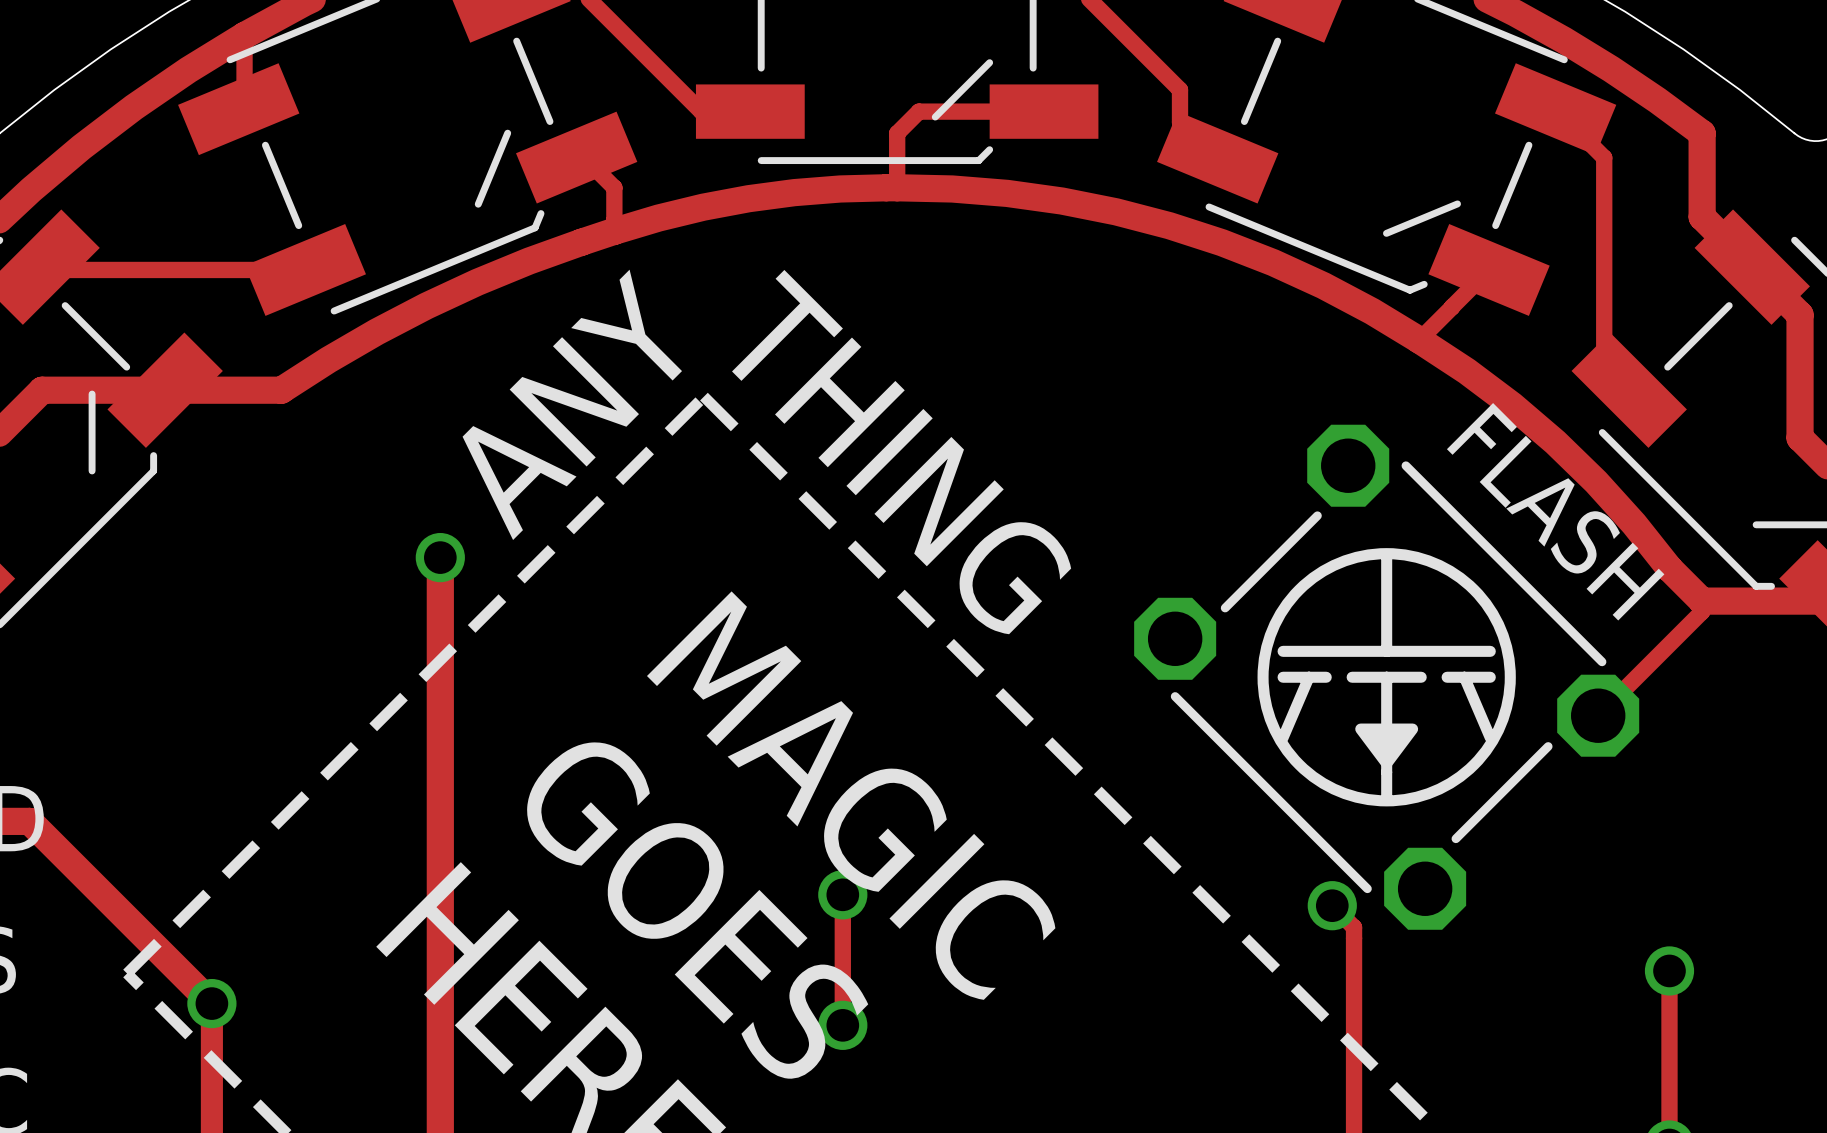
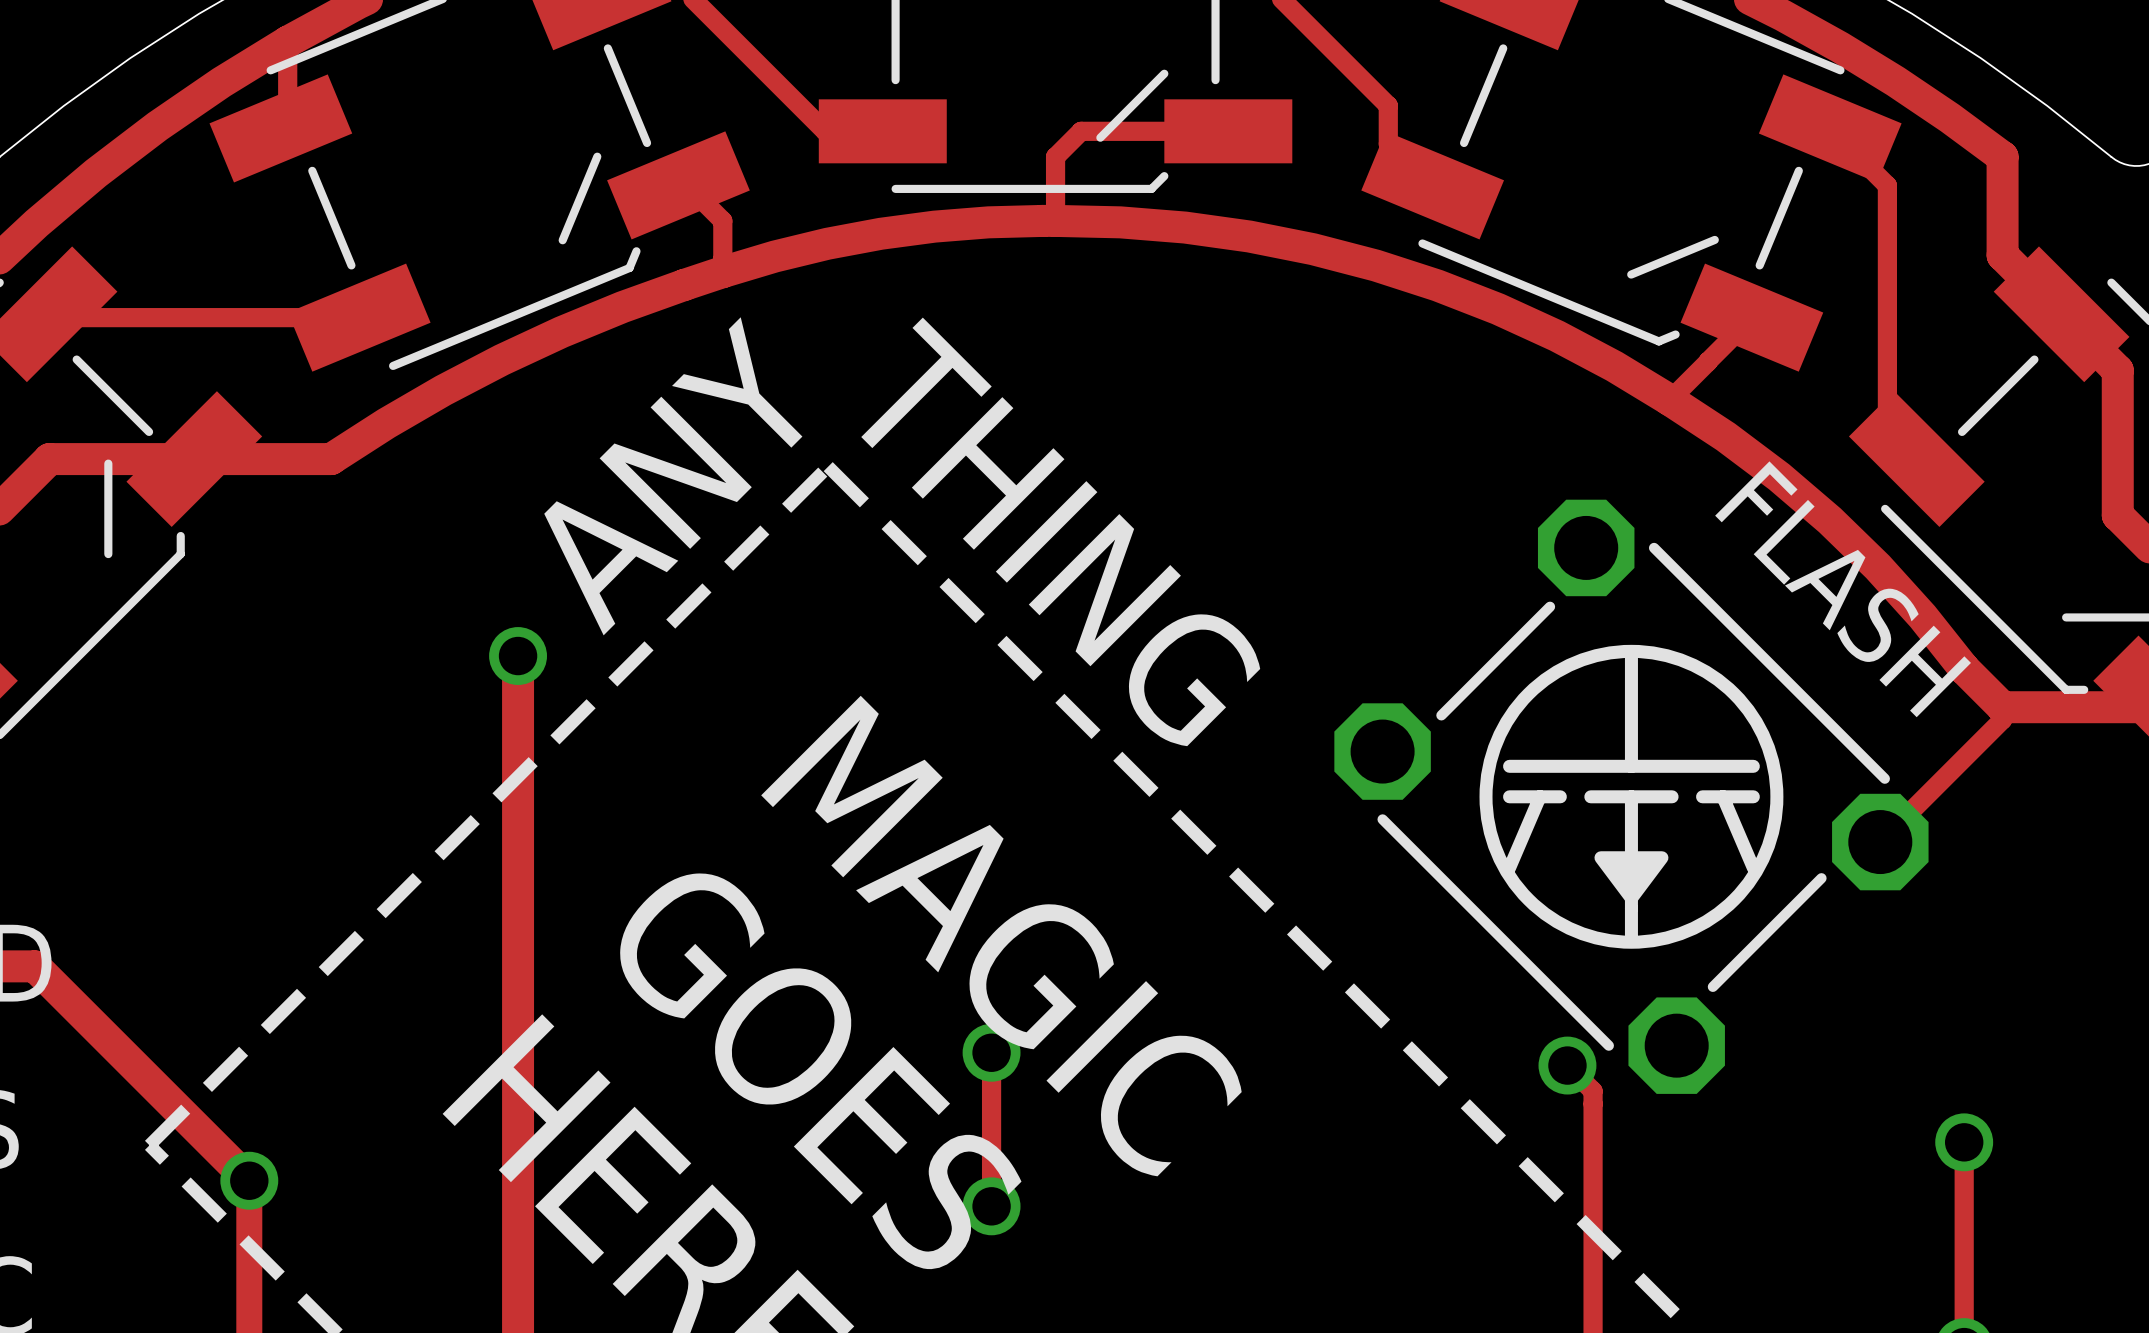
FLASH name position: FLASH (1555, 511) -> FLASH (1843, 589)

